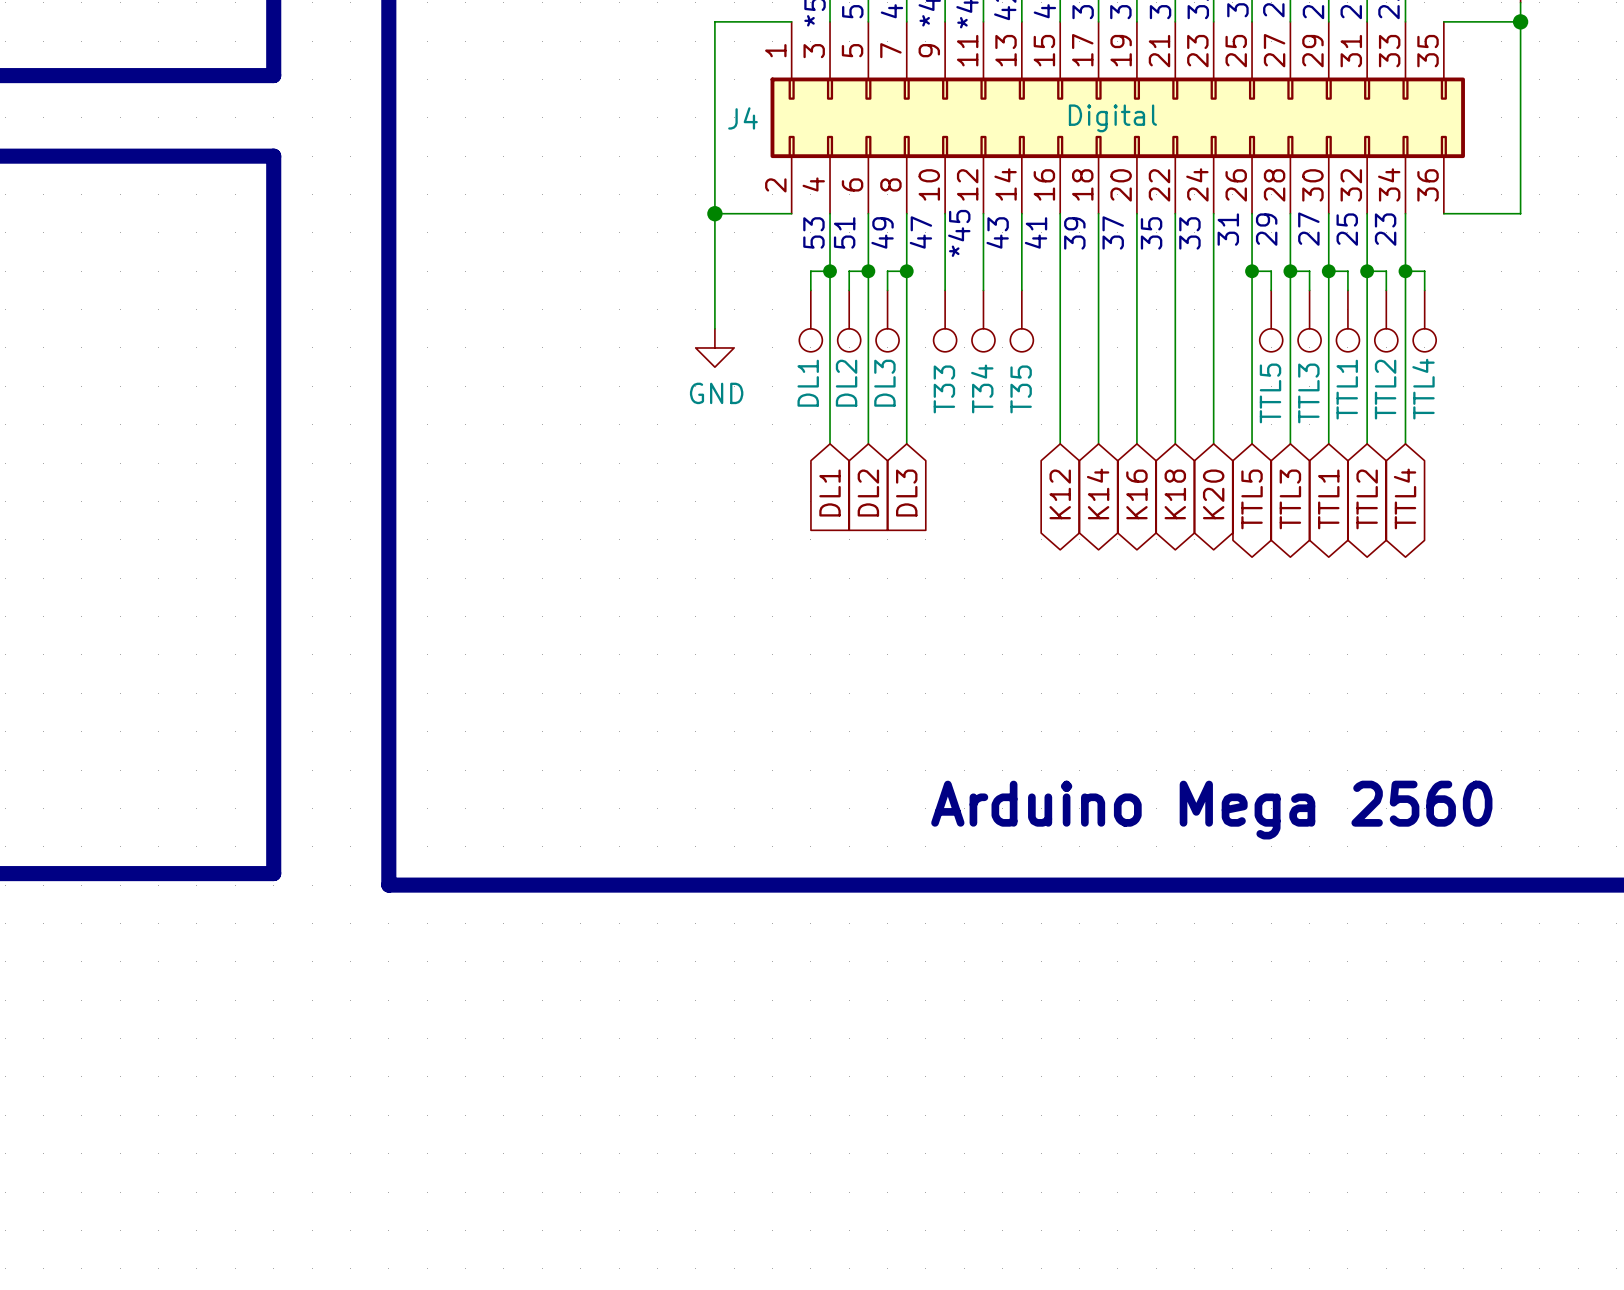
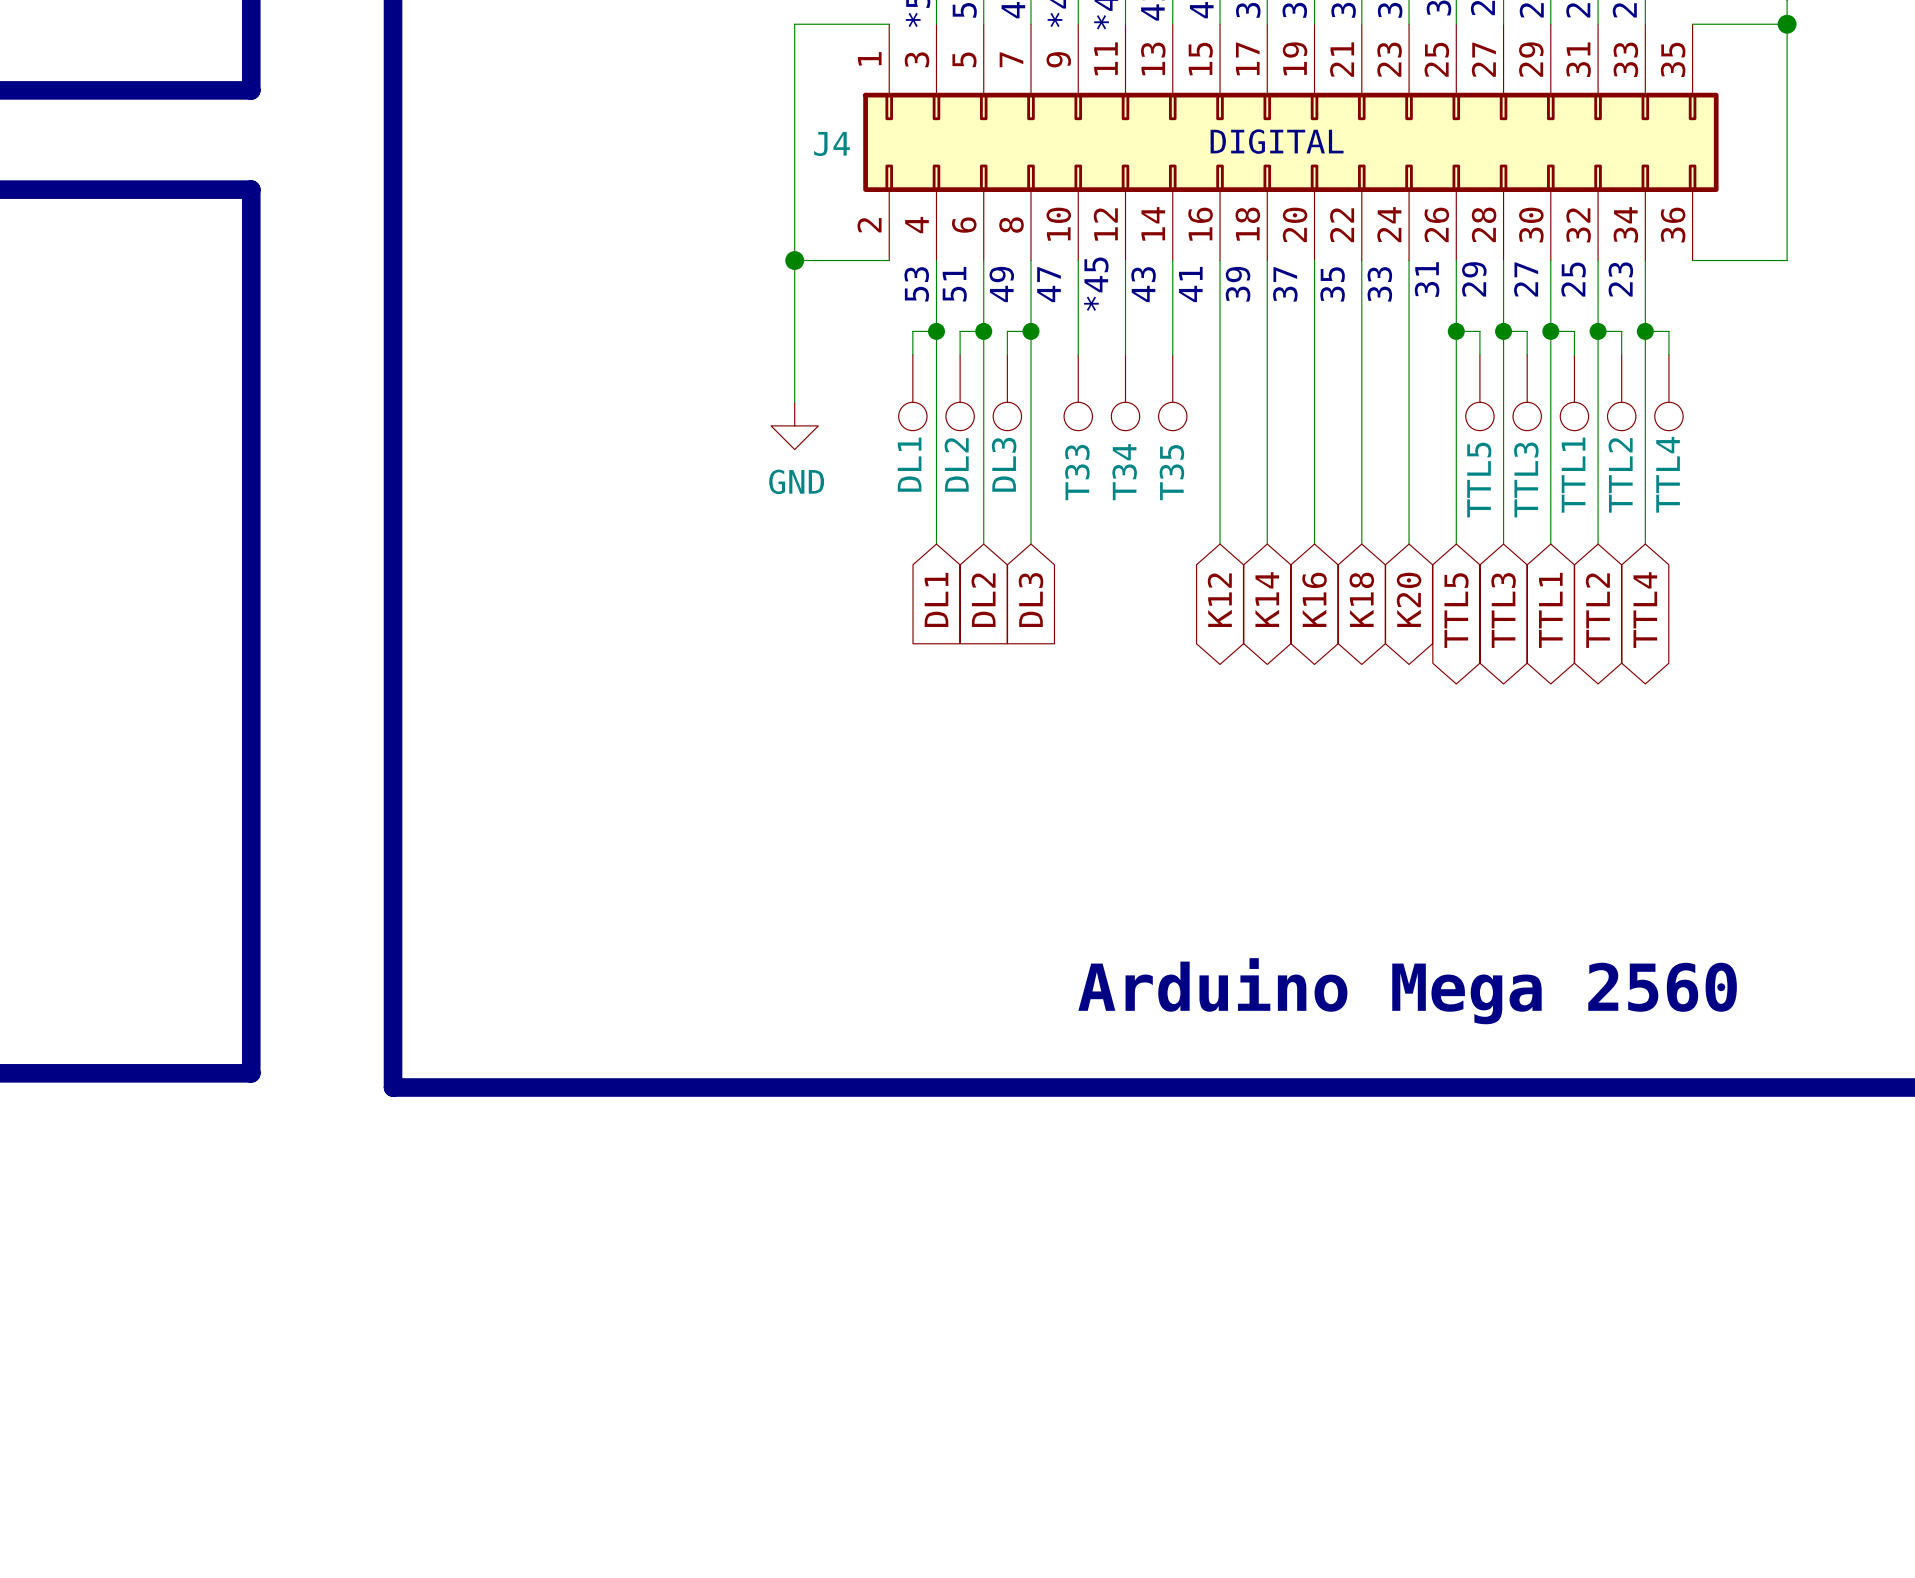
text: none -> DIGITAL (1277, 141)
J4 value: Digital (1112, 118) -> none

